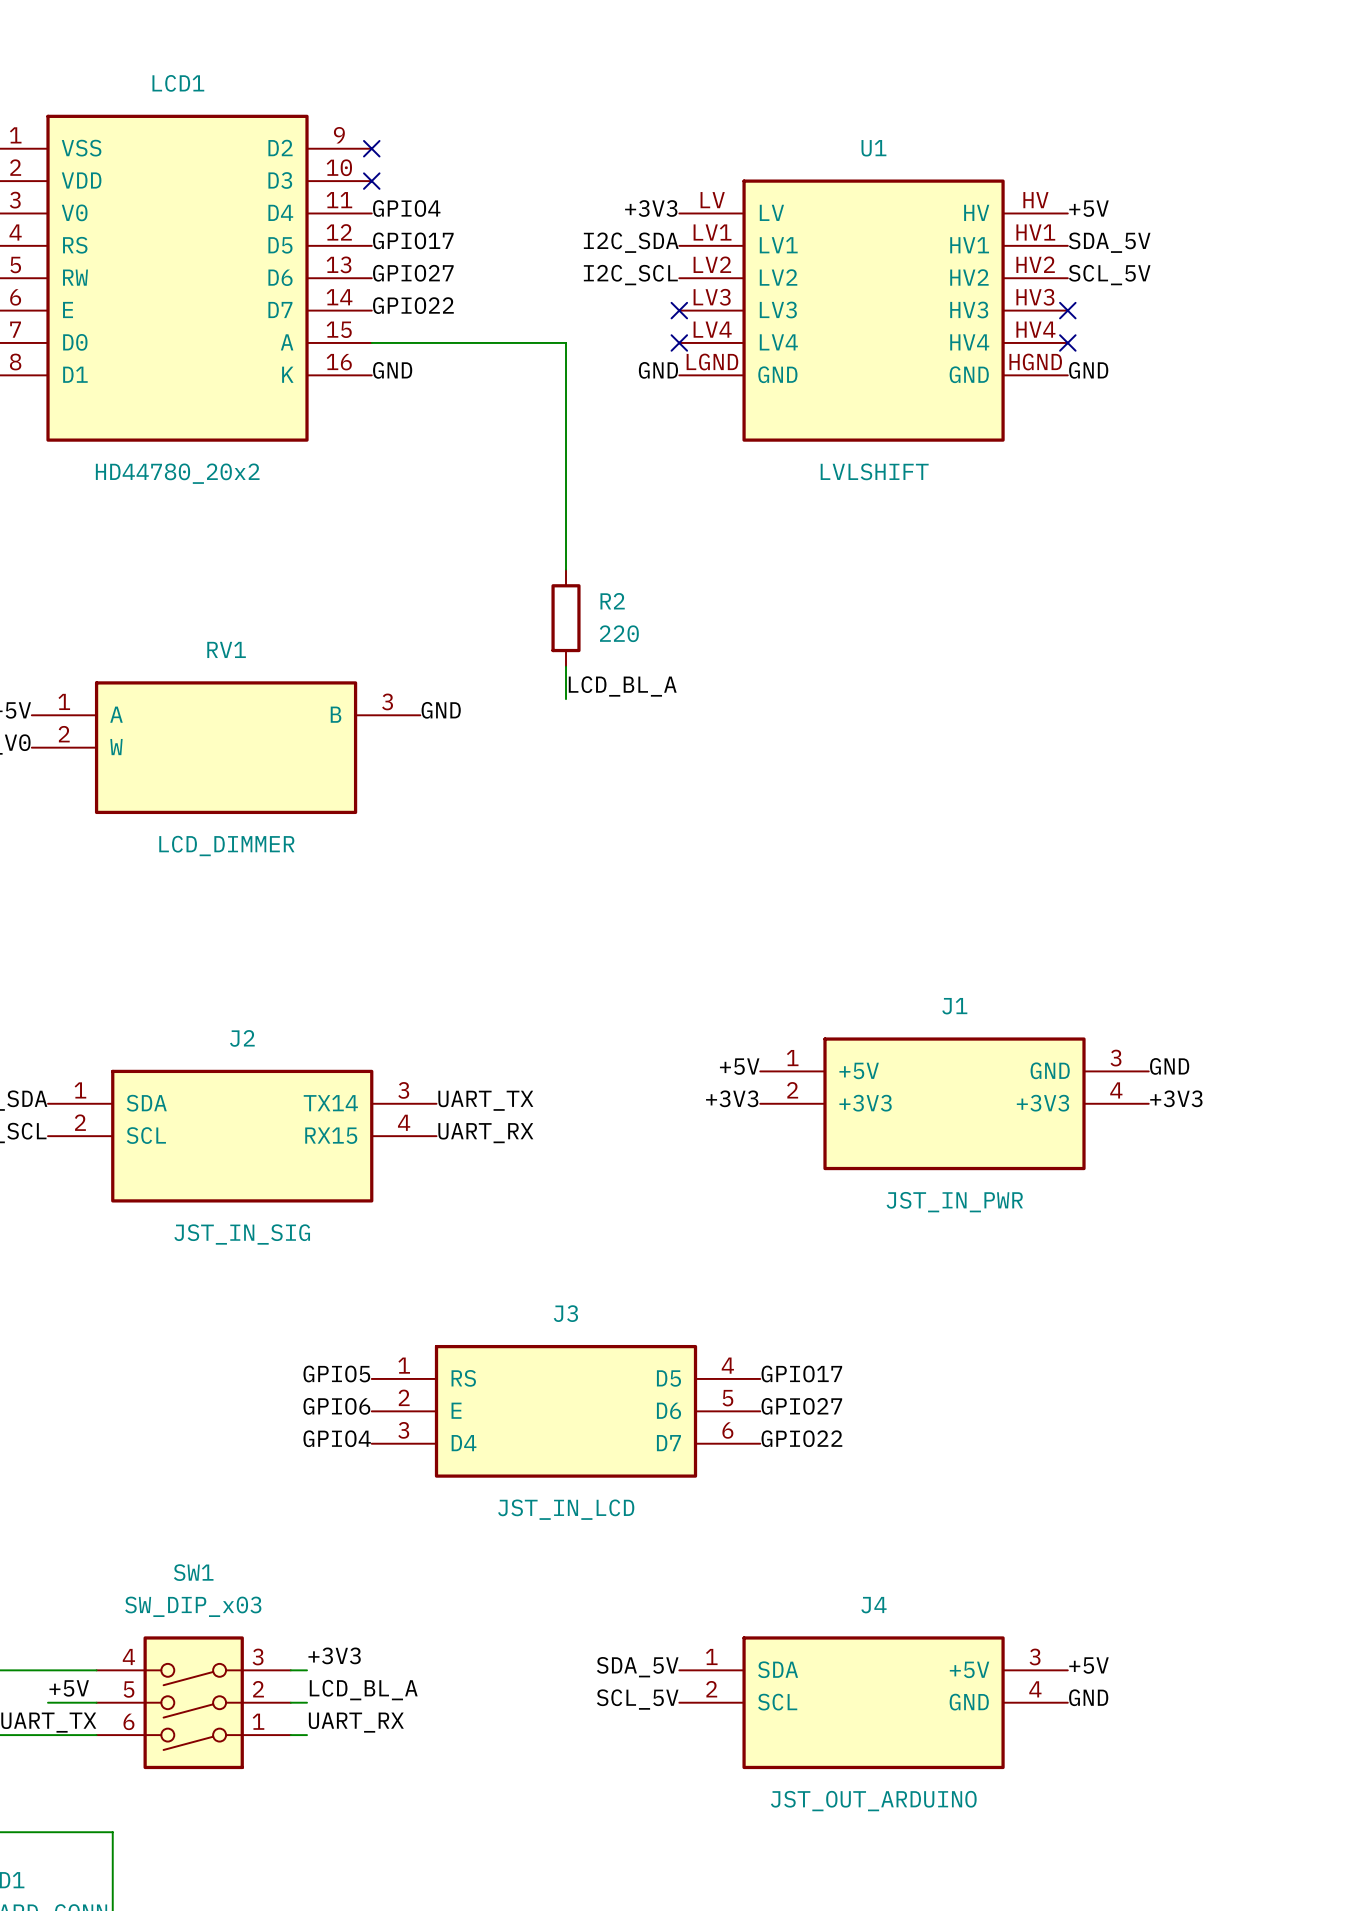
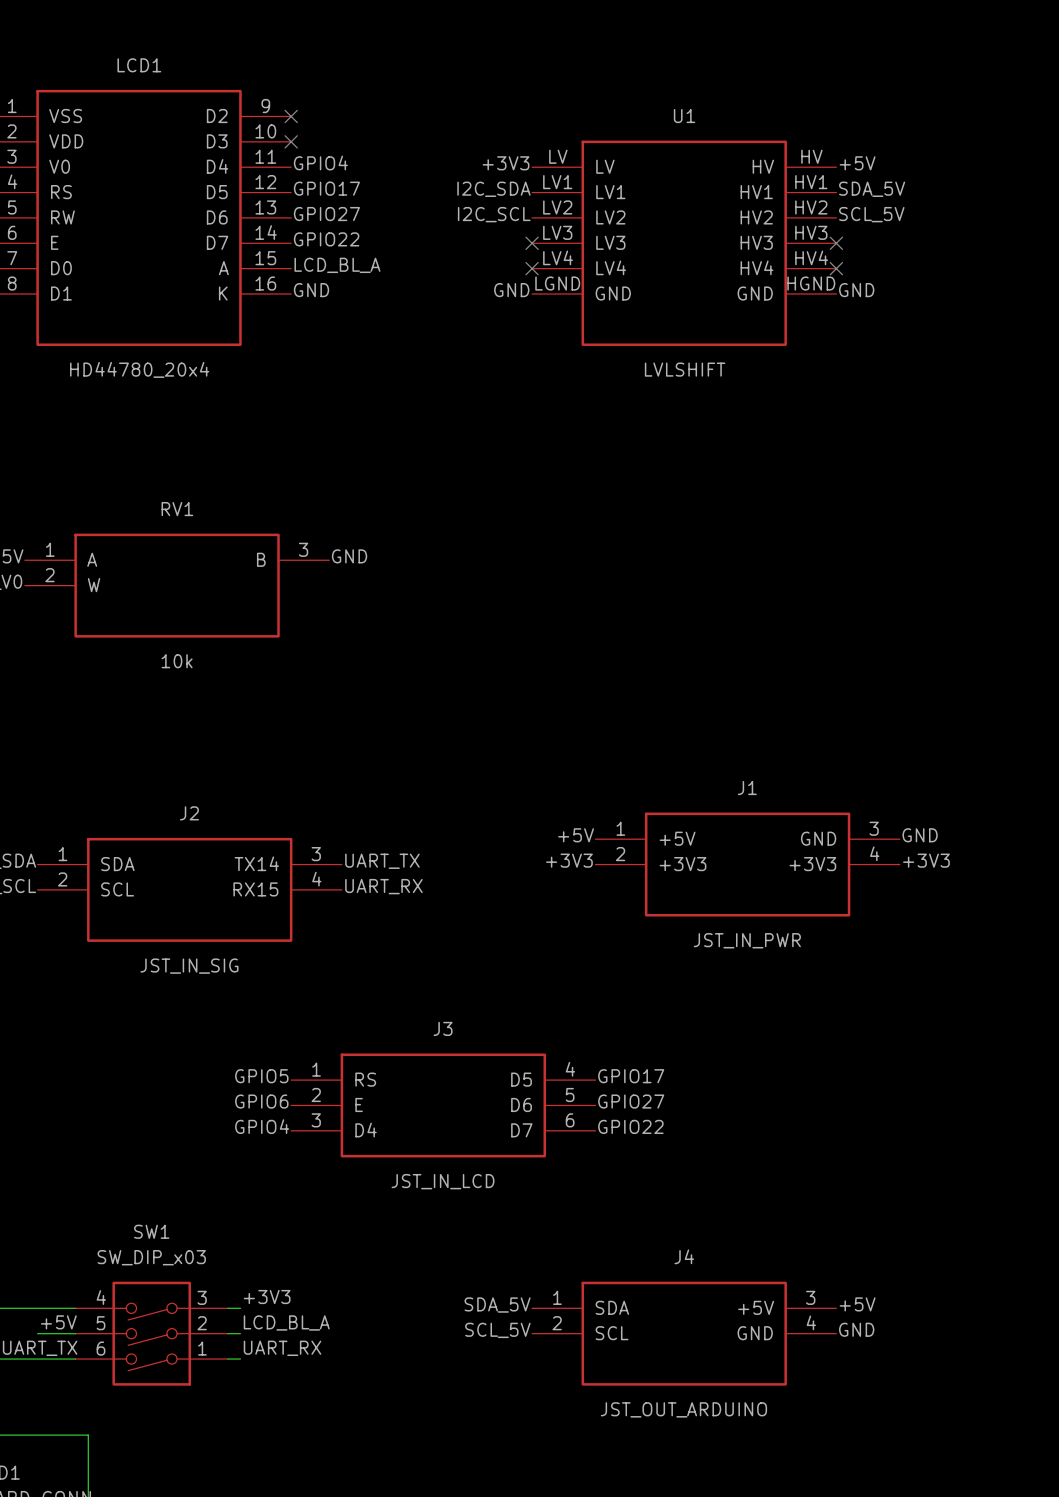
label: none -> LCD_BL_A (337, 265)
wire: (371, 342) (566, 342) (566, 569) -> none
LCD1 value: HD44780_20x2 (177, 473) -> HD44780_20x4 (139, 369)
R2: 220 (566, 618) -> none
wire: (566, 666) (566, 699) -> none
label: LCD_BL_A (622, 686) -> none
RV1 value: LCD_DIMMER (226, 846) -> 10k (177, 661)

